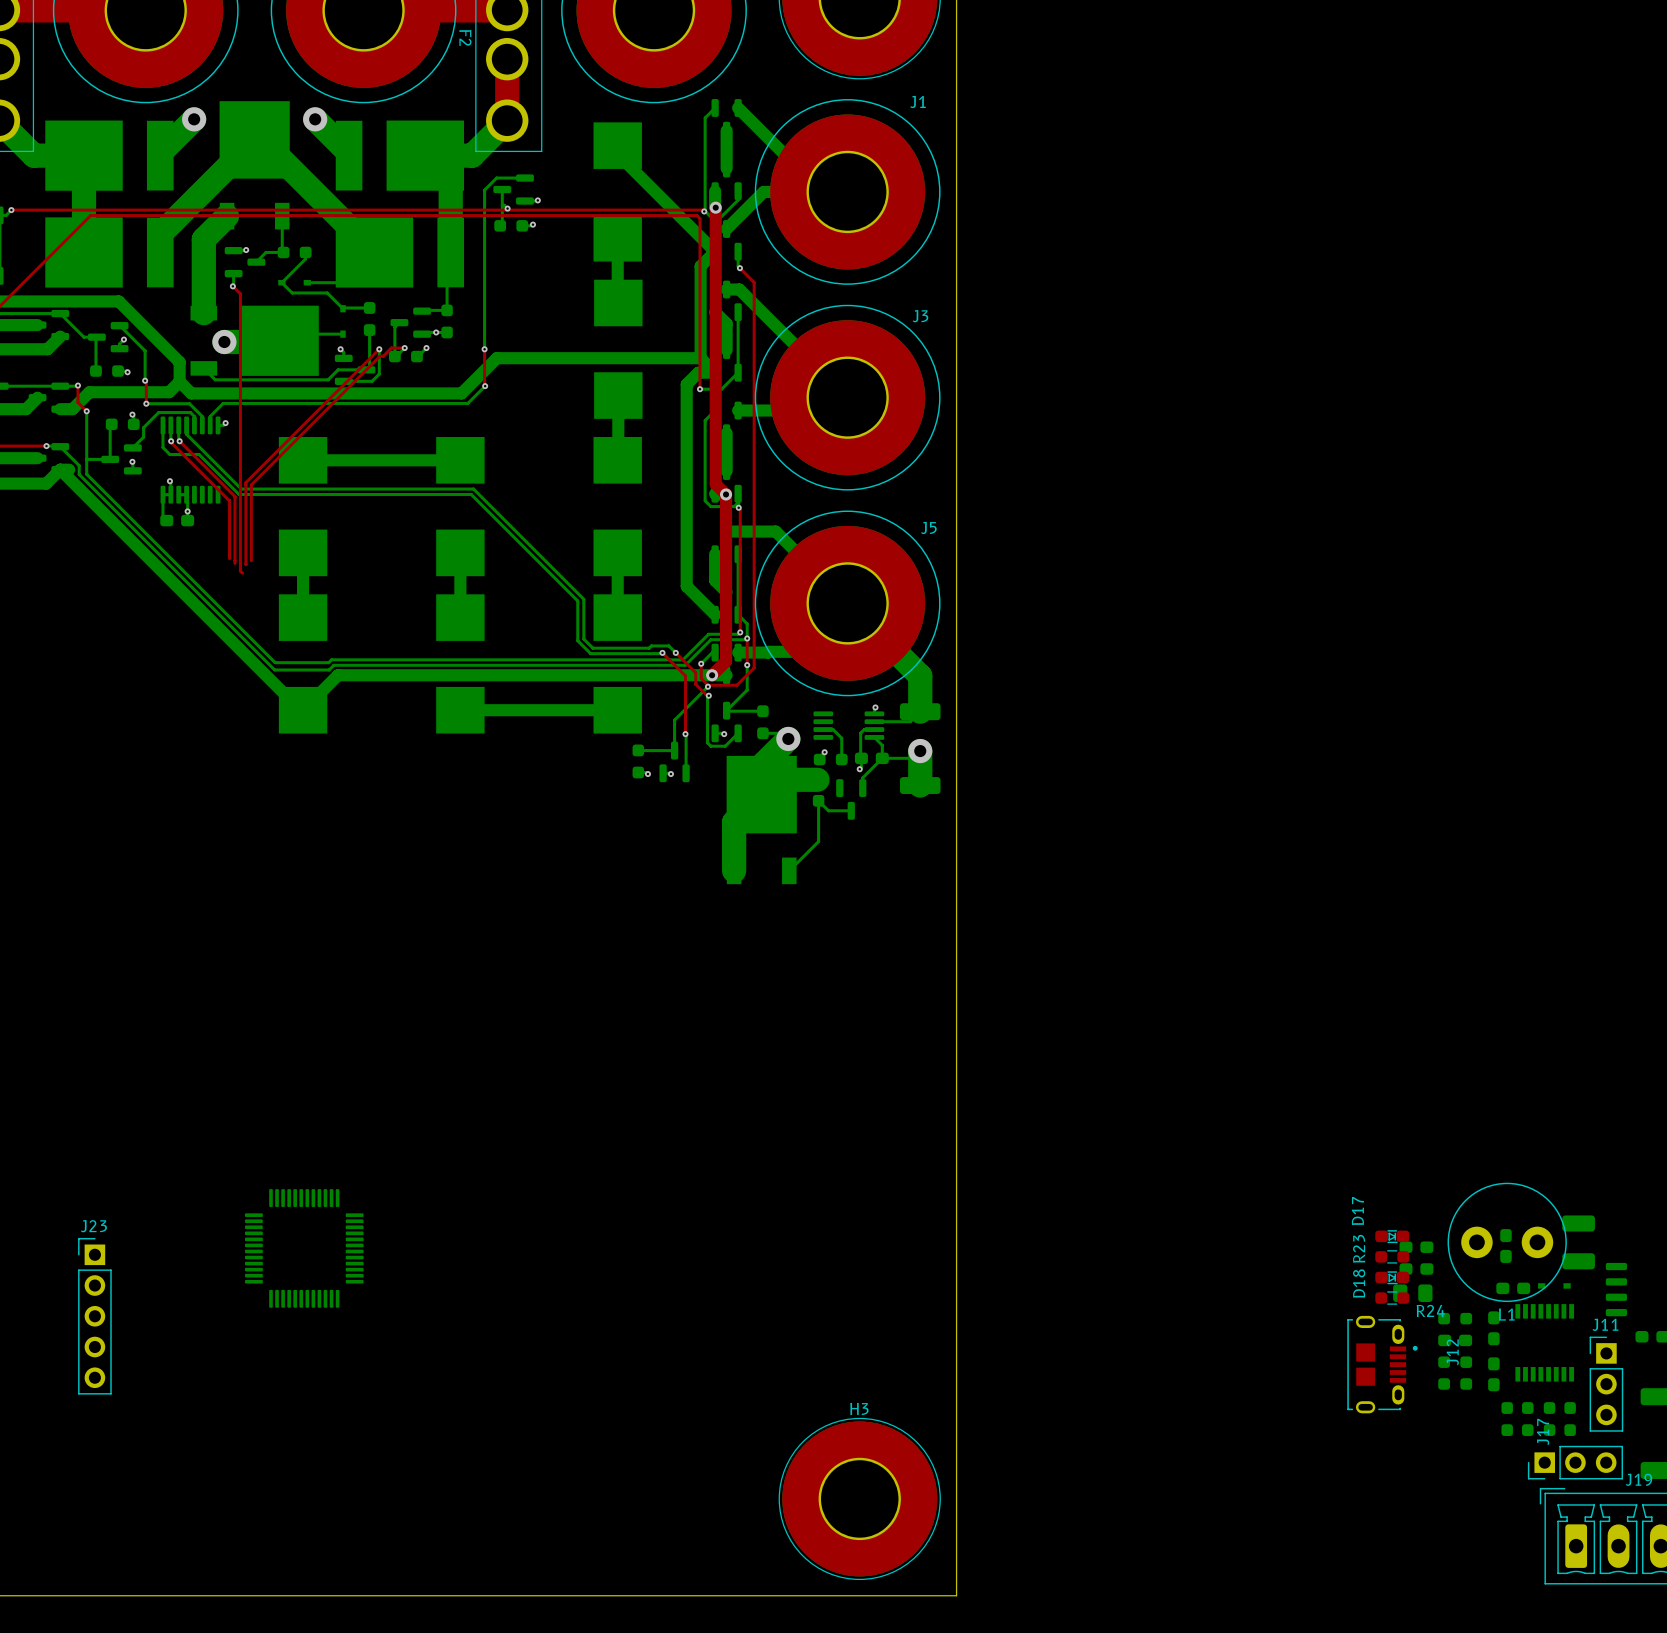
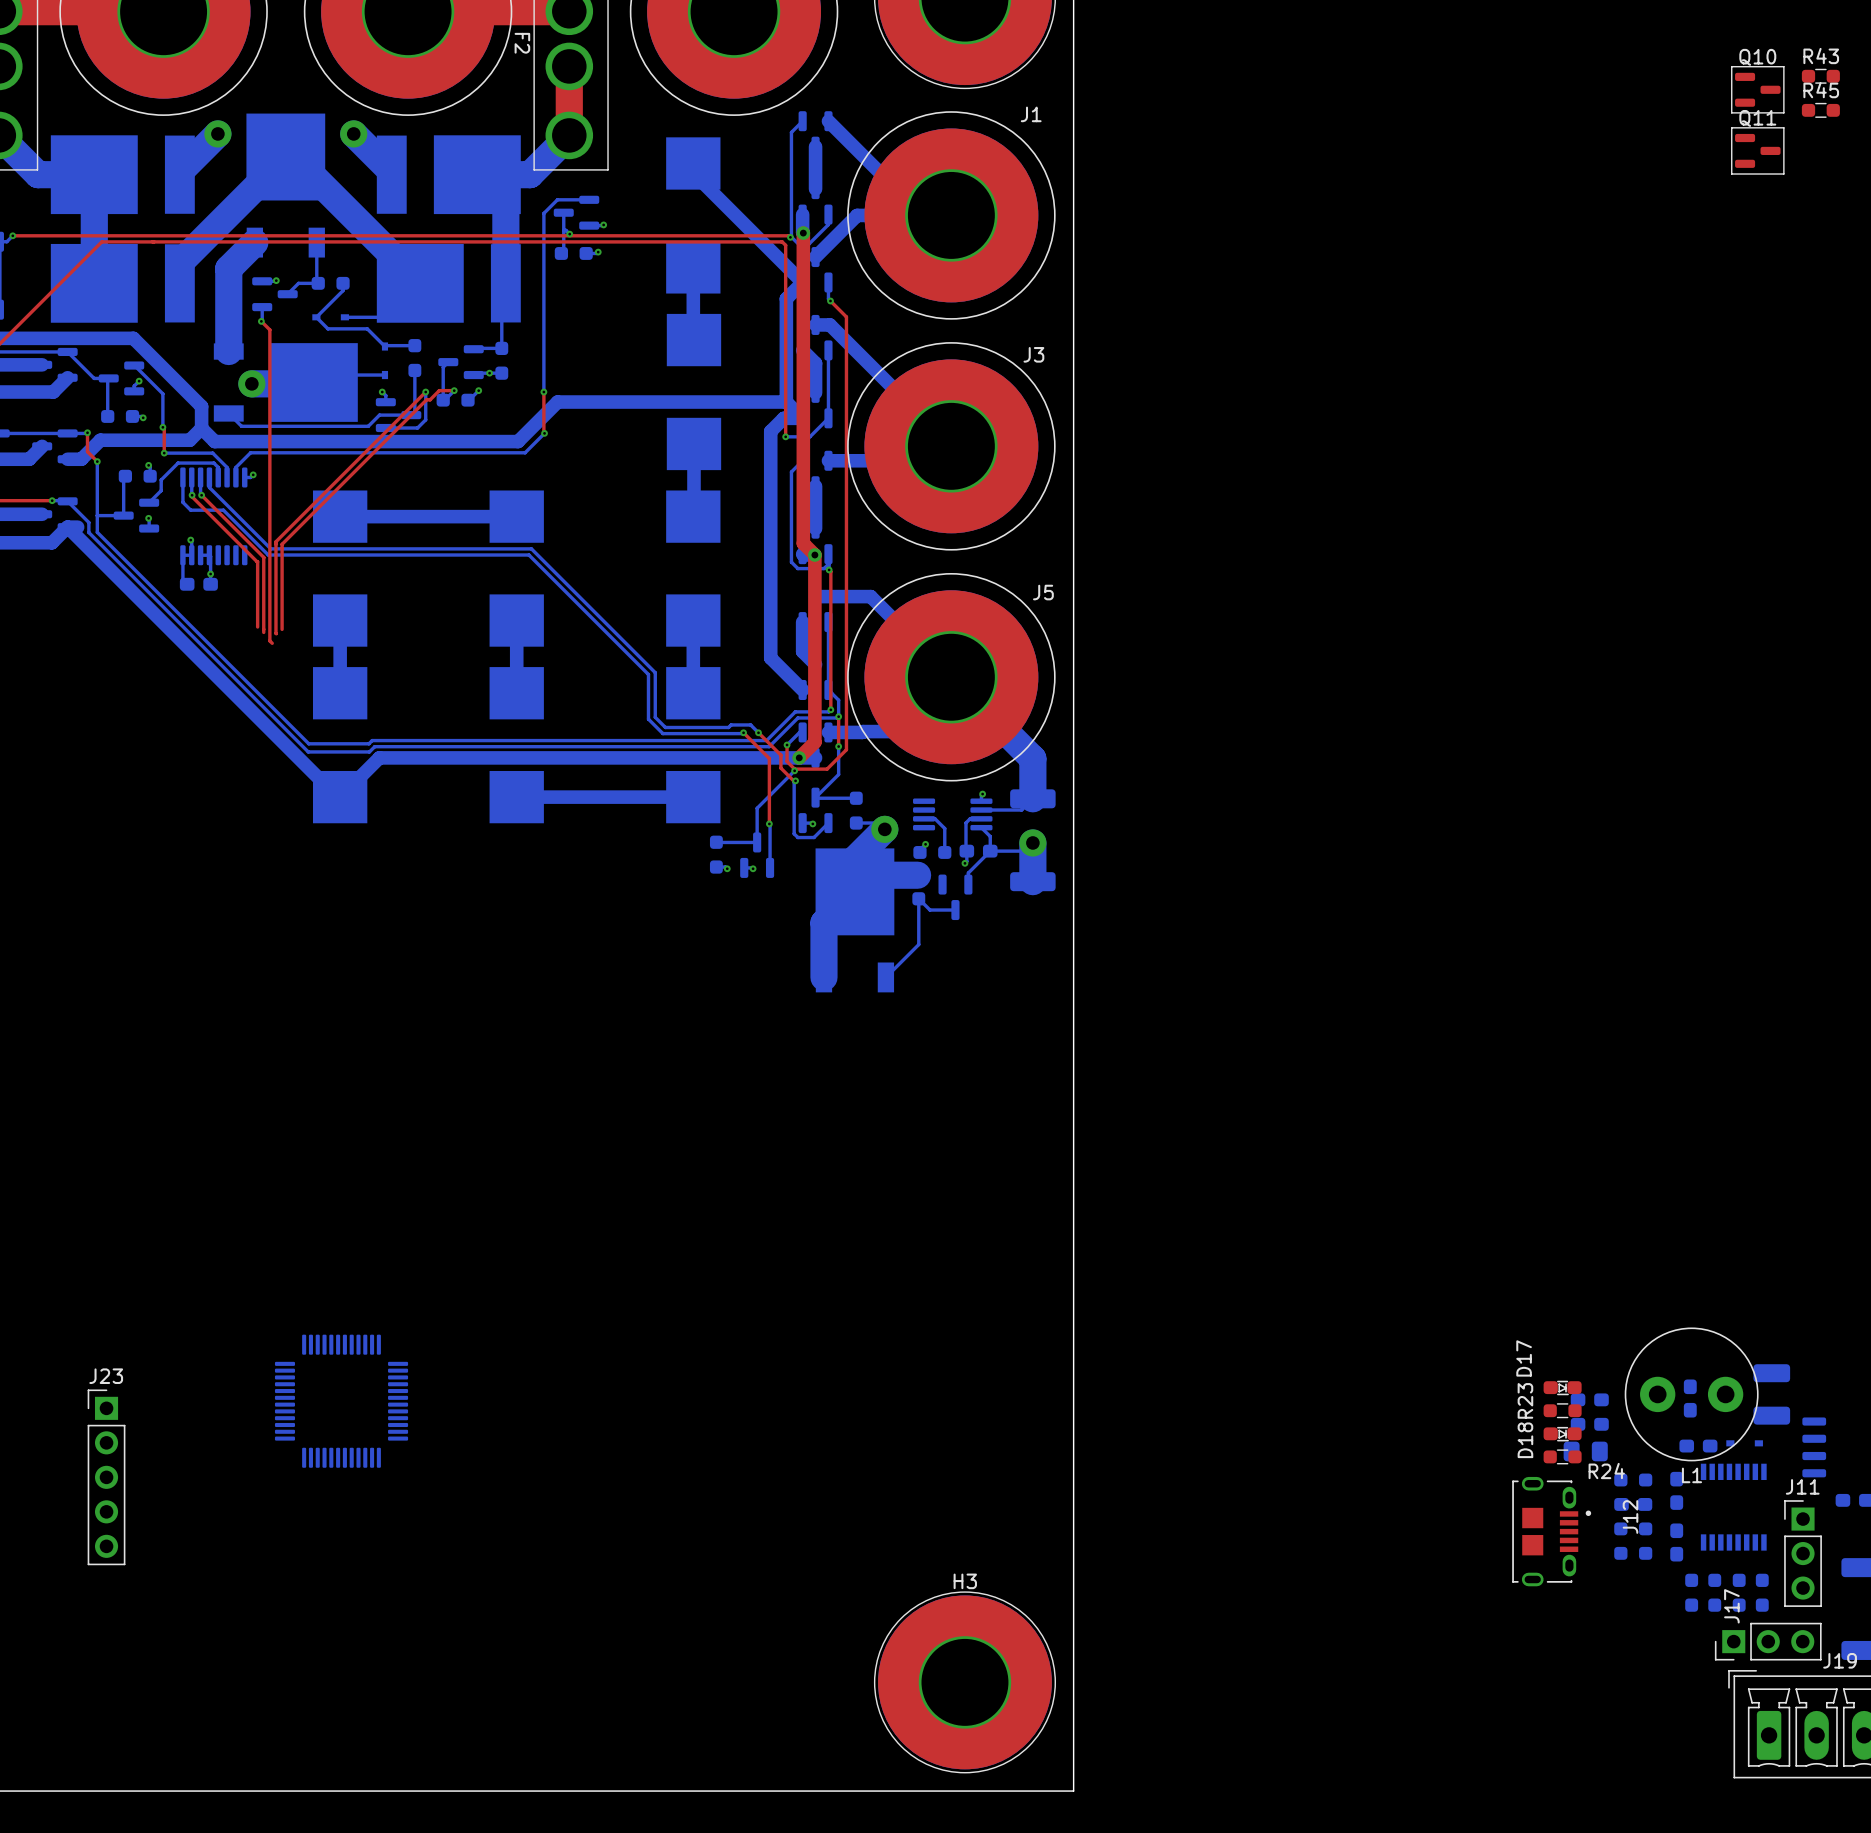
R43: none -> (1820, 76)
Q10: none -> (1757, 89)
R45: none -> (1820, 110)
Q11: none -> (1757, 150)

